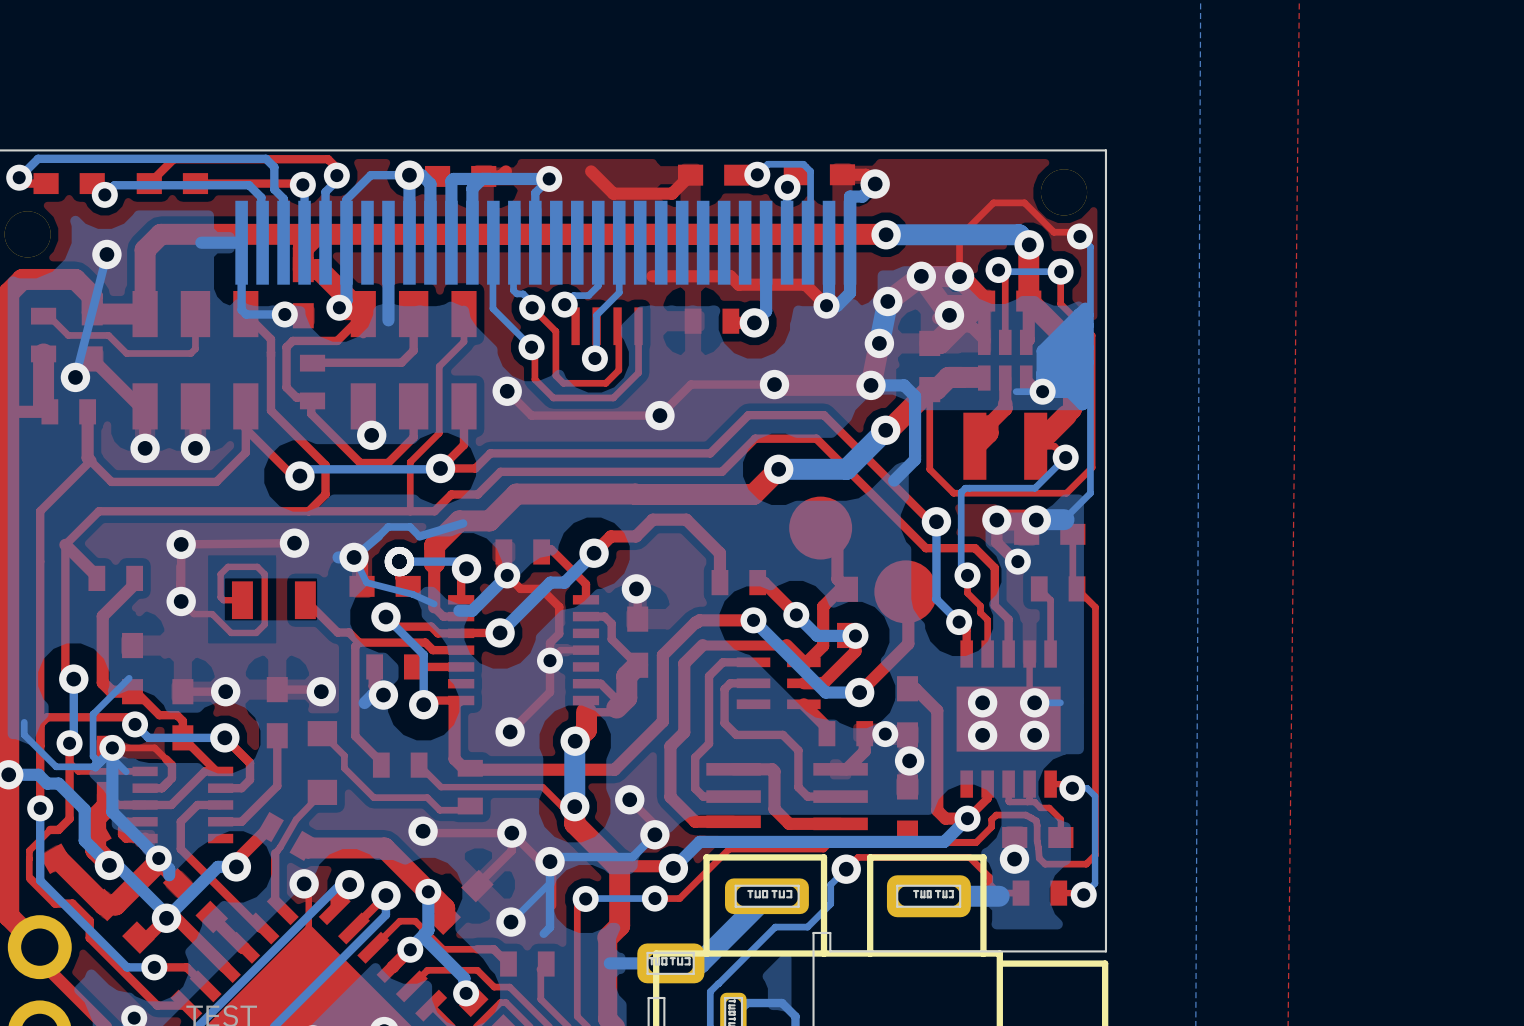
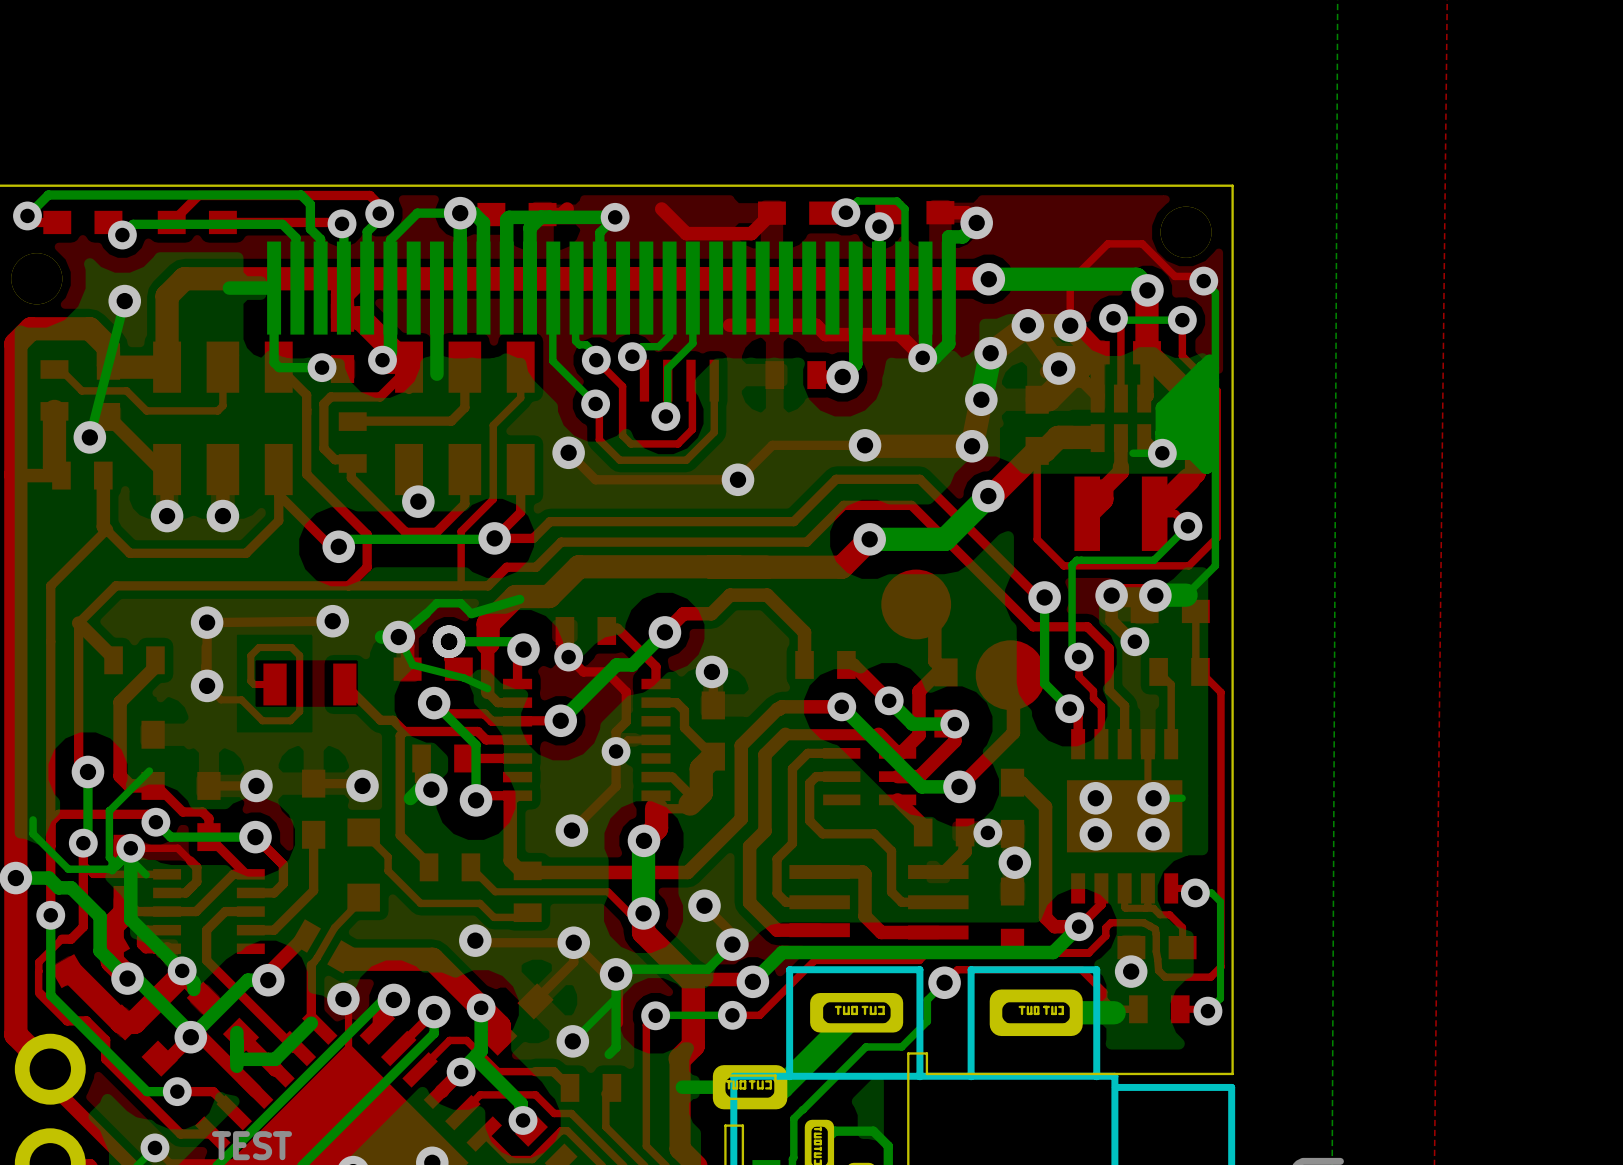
bottom track: (871, 385) (904, 385) (915, 396) (915, 459) (894, 480) -> none
bottom track: (507, 575) (472, 610) (459, 610) -> none
bottom track: none -> (311, 1023) (275, 1059) (236, 1058)
bottom track: none -> (236, 1032) (236, 1066)

